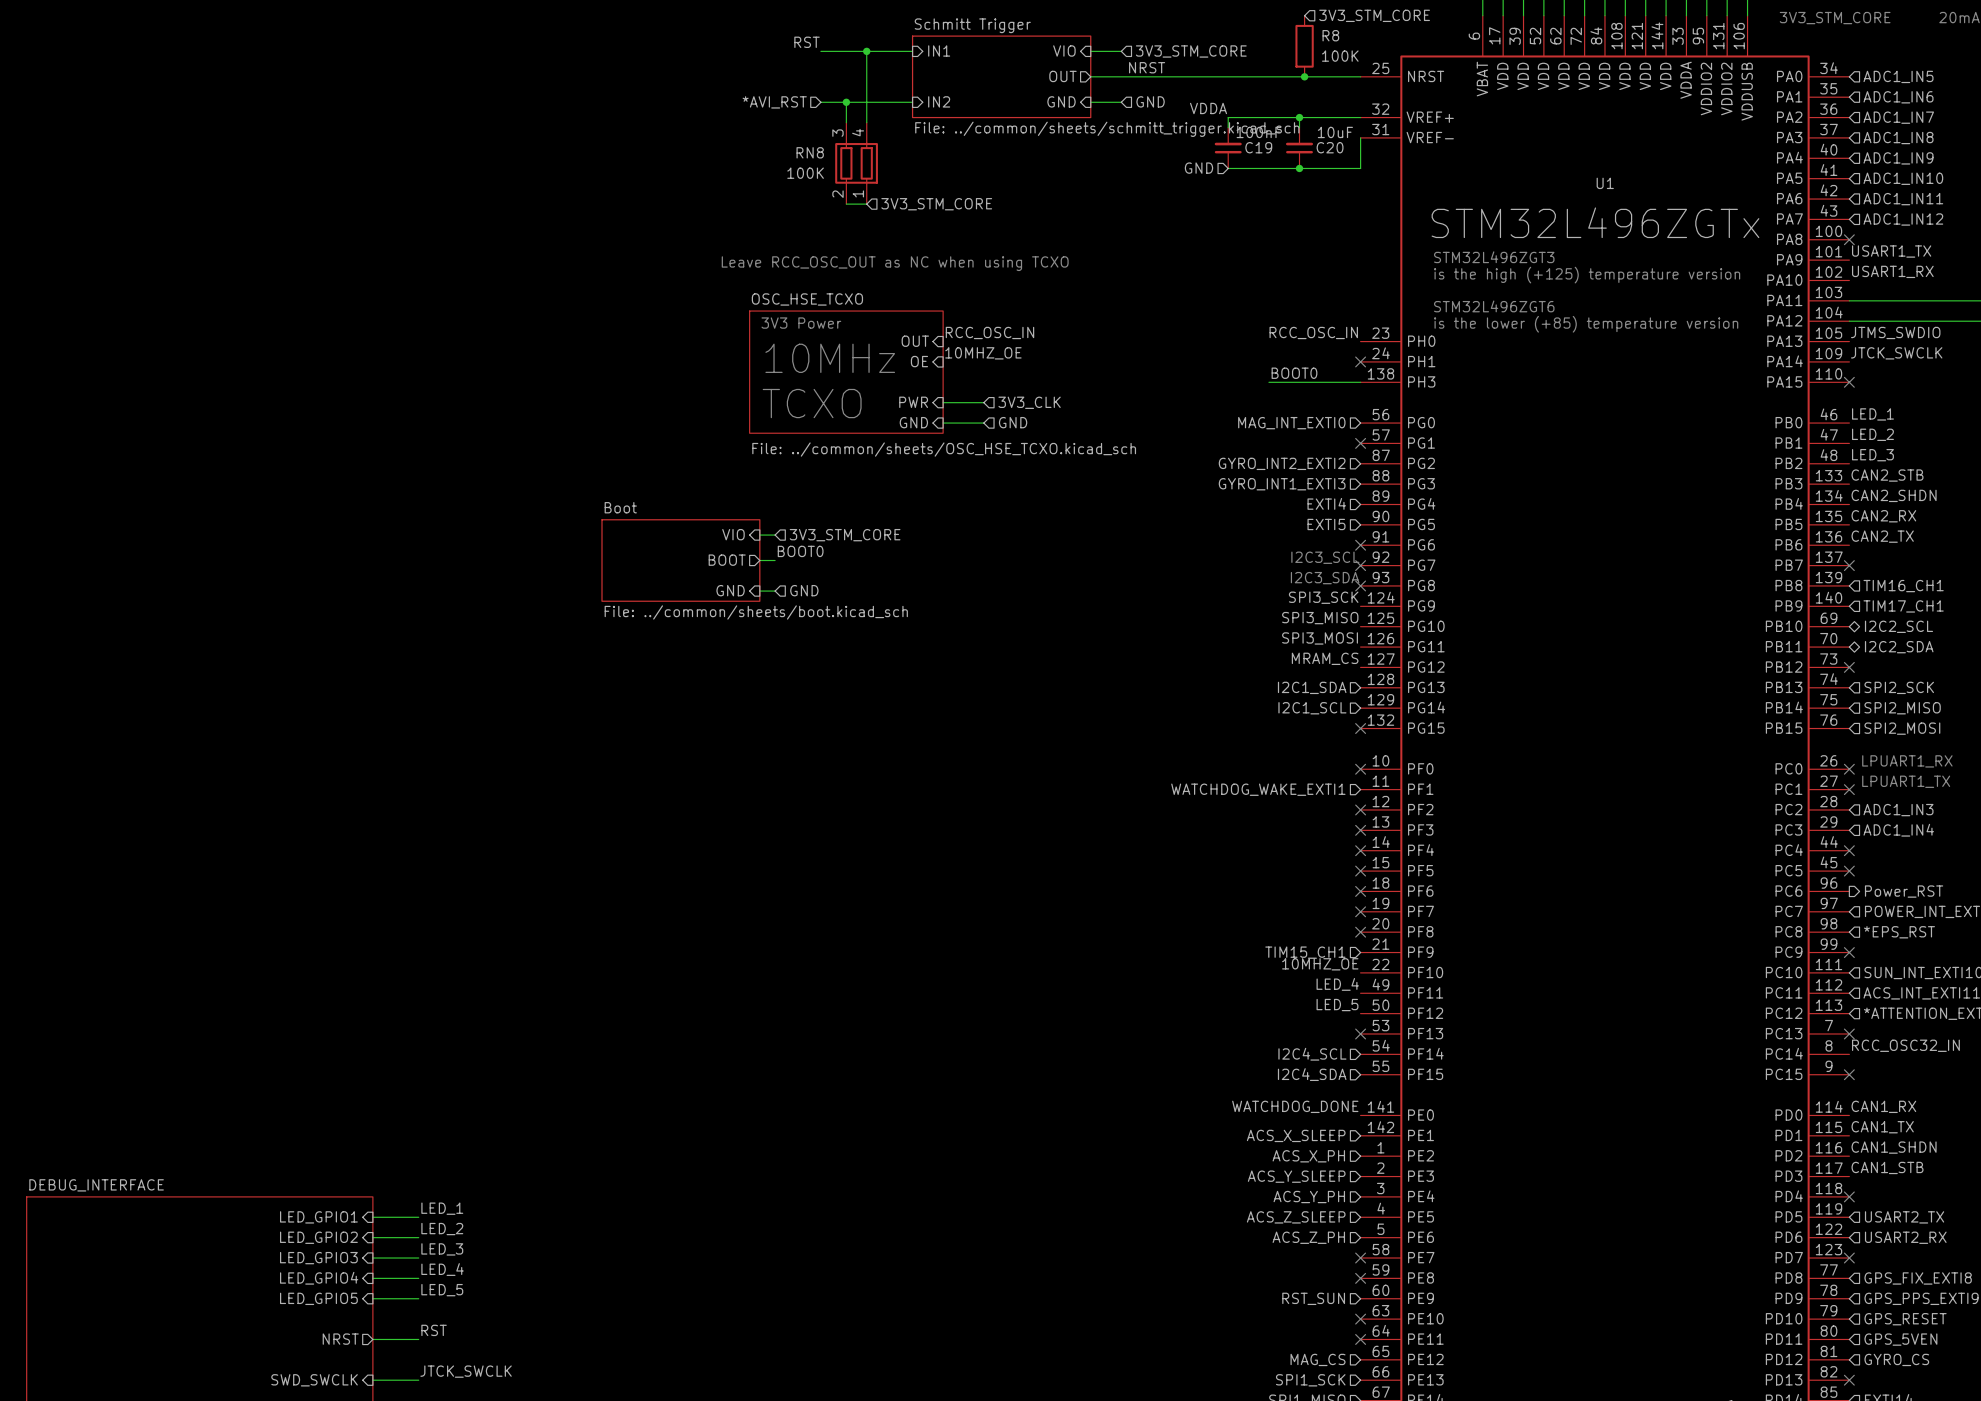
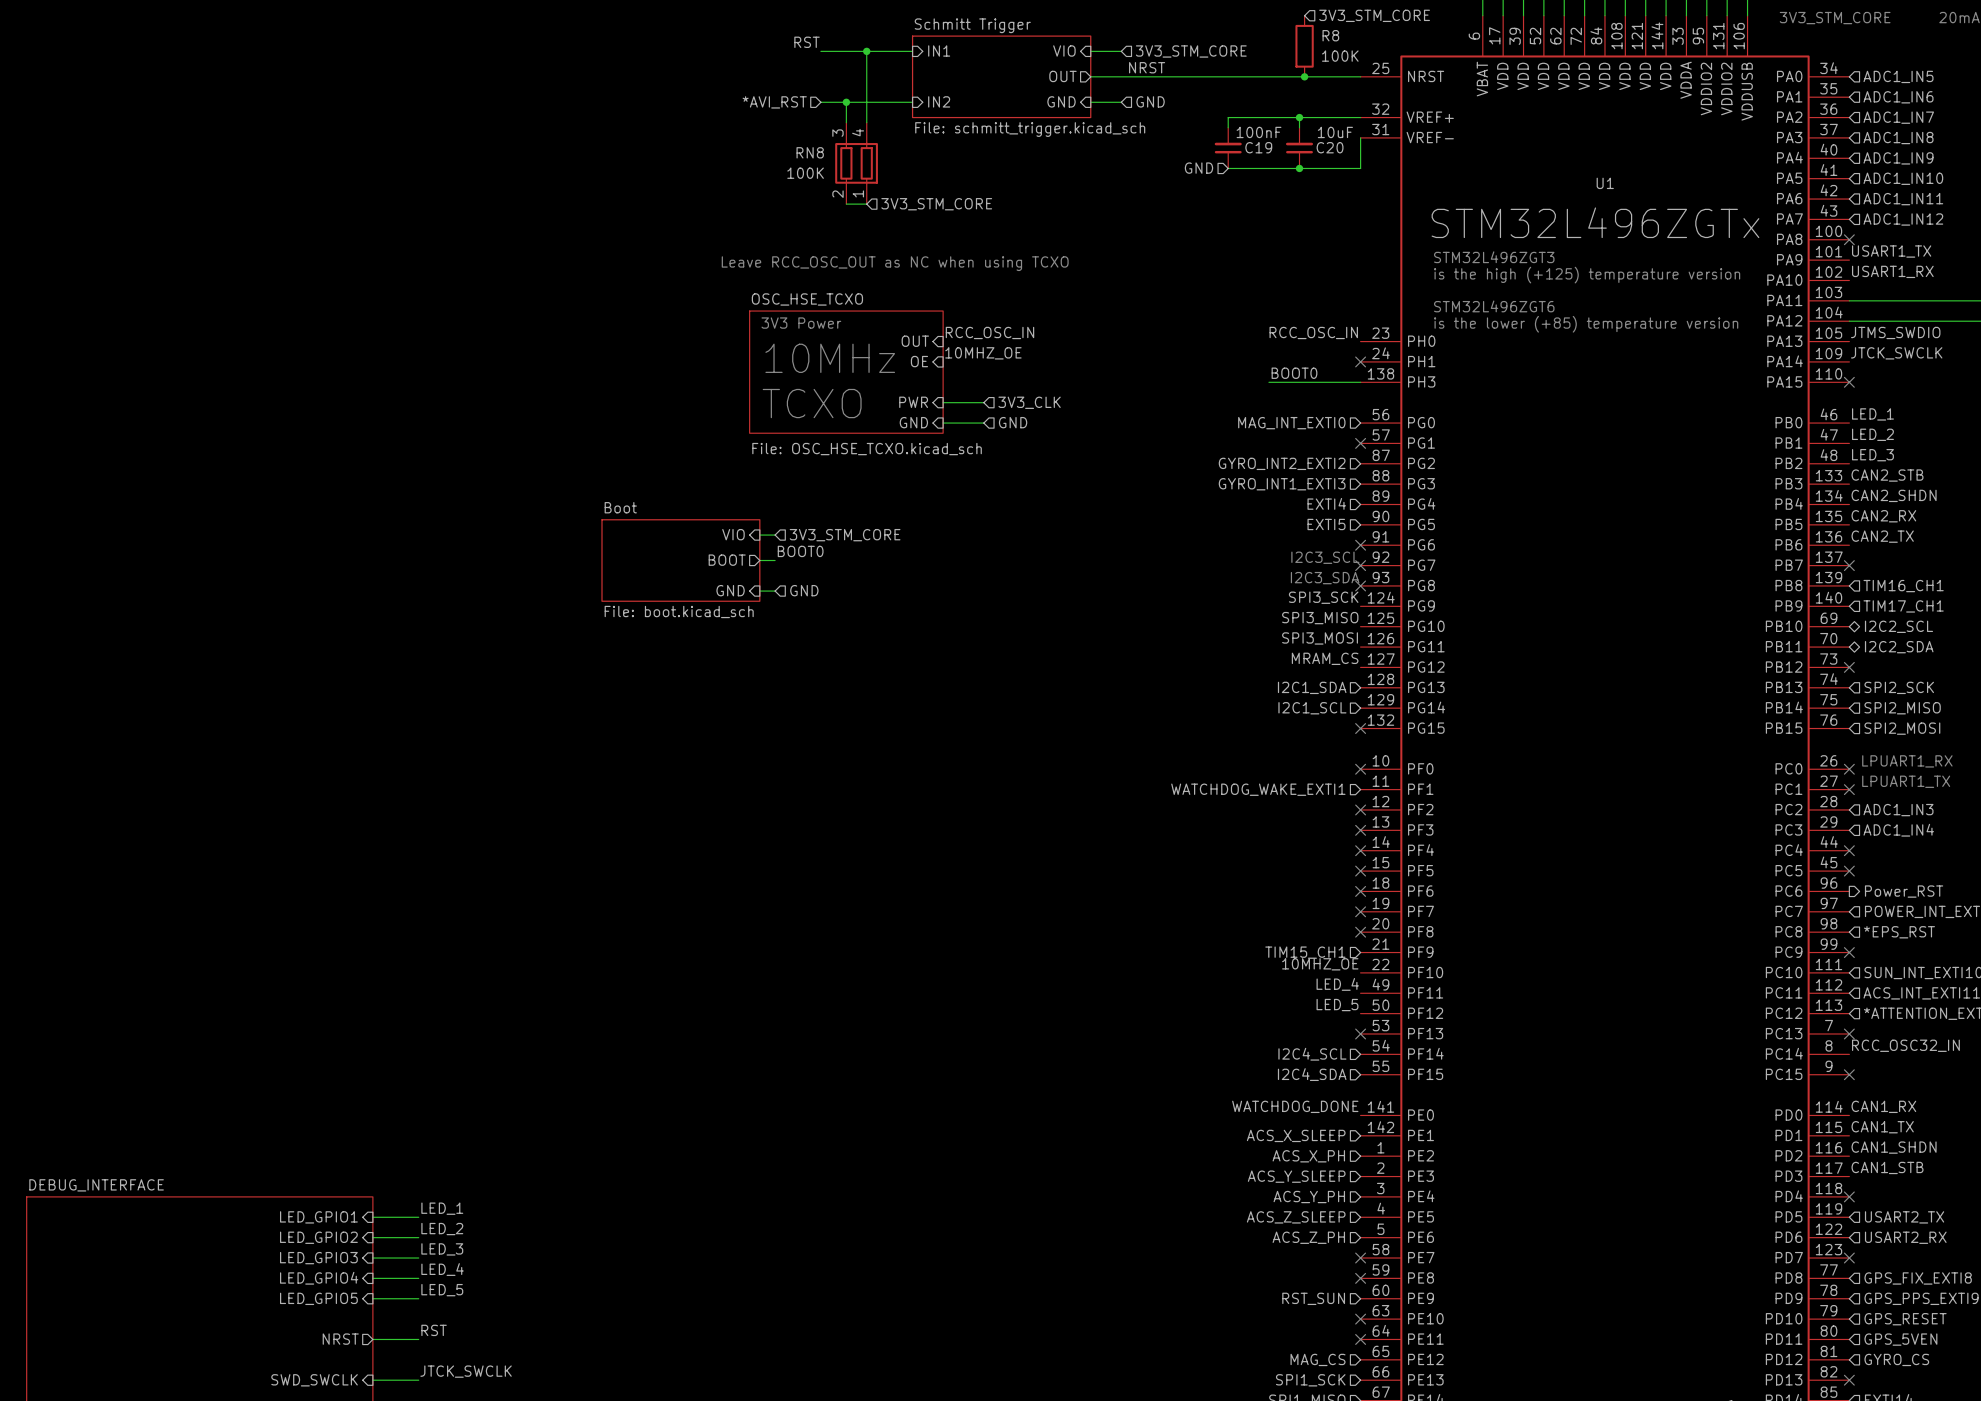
label: VDDA (1208, 108) -> none
sheet Schmitt Trigger value: File: ../common/sheets/schmitt_trigger.kicad_sch (1107, 129) -> File: schmitt_trigger.kicad_sch (1030, 129)
sheet OSC_HSE_TCXO value: File: ../common/sheets/OSC_HSE_TCXO.kicad_sch (944, 449) -> File: OSC_HSE_TCXO.kicad_sch (867, 449)
sheet Boot value: File: ../common/sheets/boot.kicad_sch (756, 612) -> File: boot.kicad_sch (679, 611)

